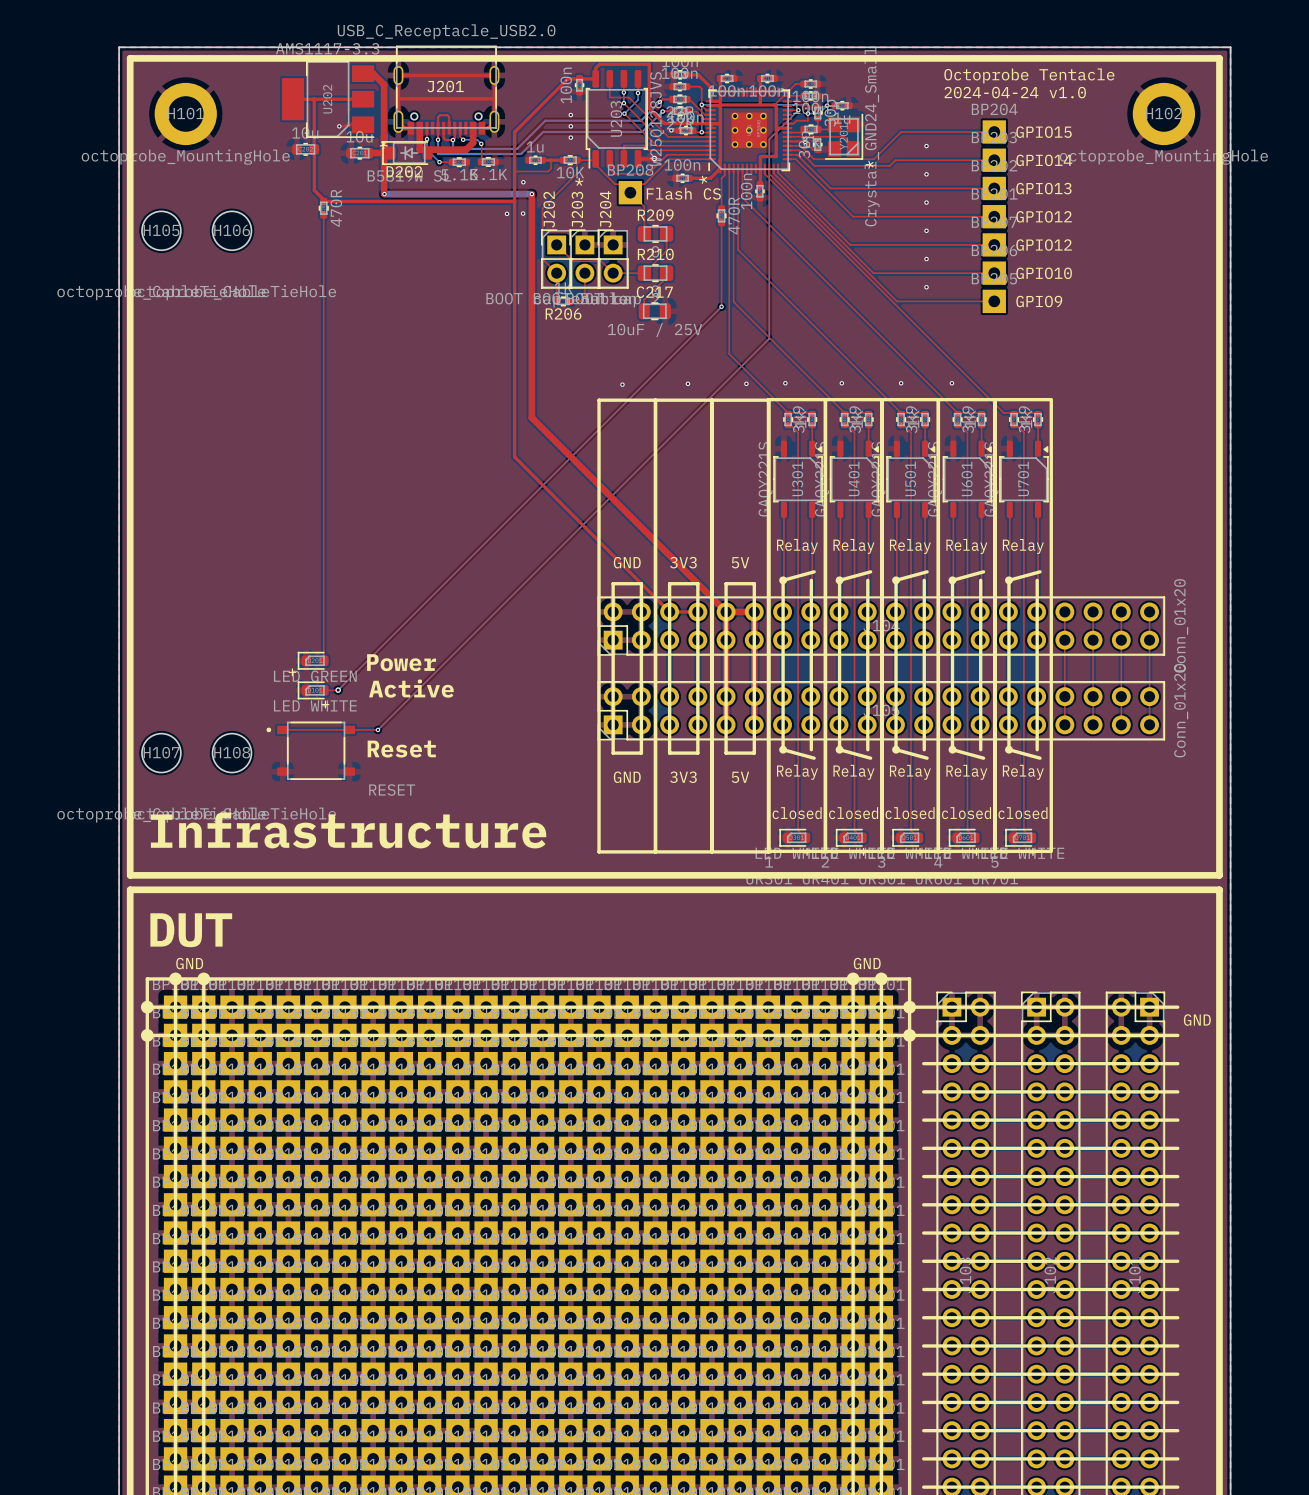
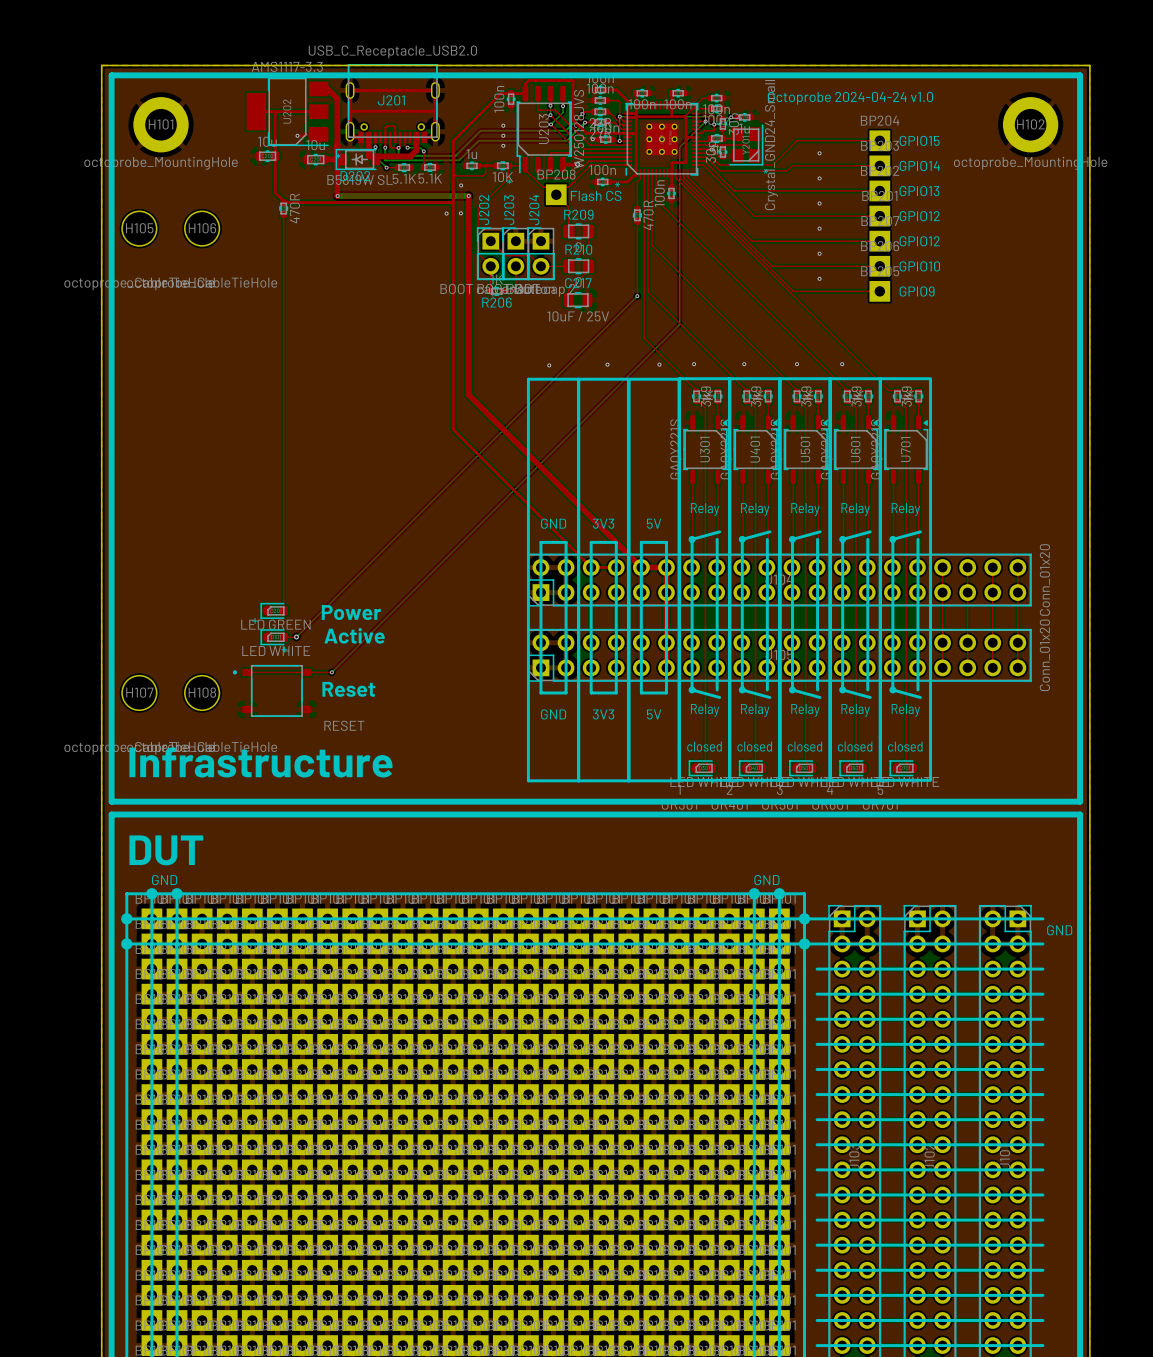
text: Octoprobe Tentacle (1029, 75) -> none
text: 2024-04-24 v1.0 (1015, 92) -> Octoprobe 2024-04-24 v1.0 (850, 98)

